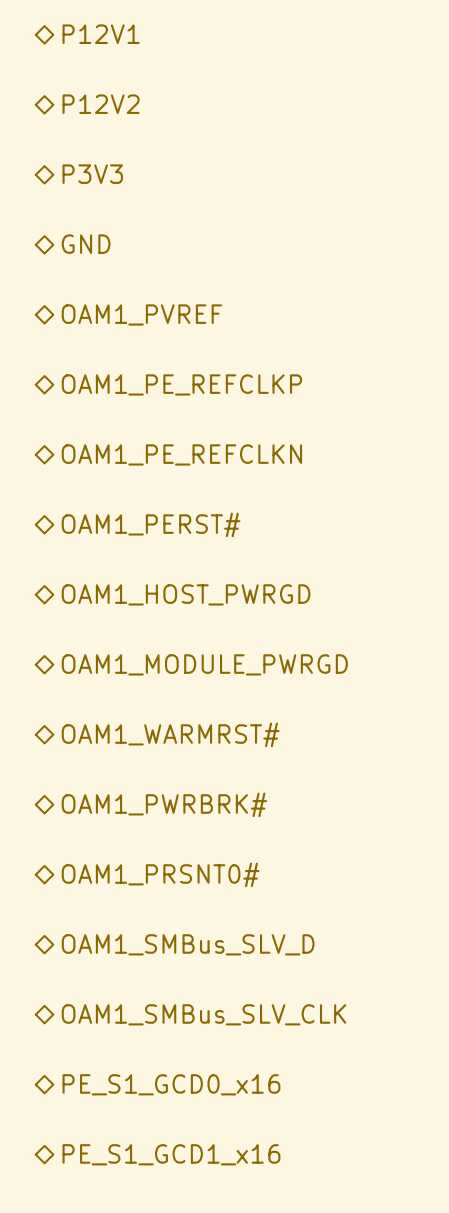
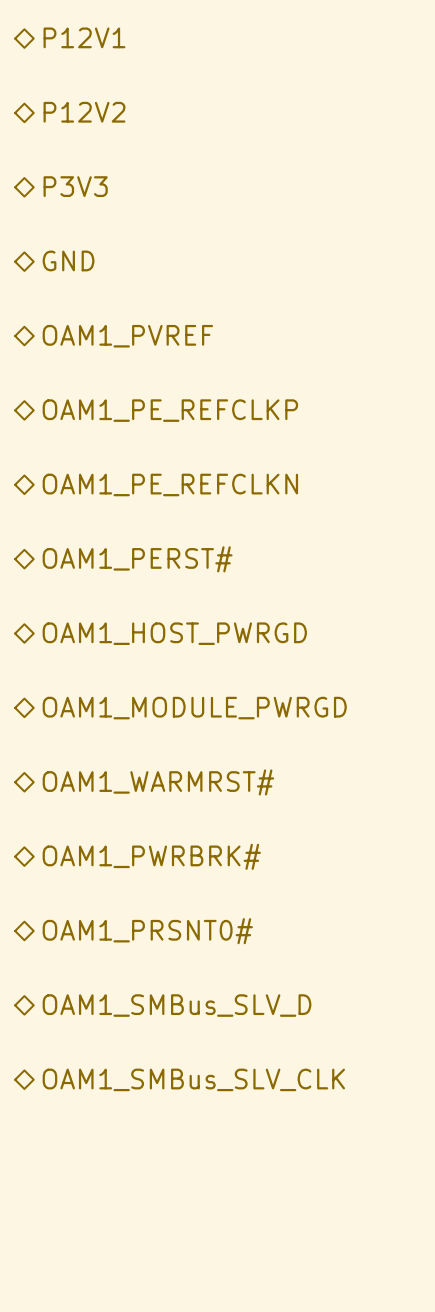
hierarchical label: PE_S1_GCD0_x16 (171, 1084) -> none
hierarchical label: PE_S1_GCD1_x16 (171, 1154) -> none

